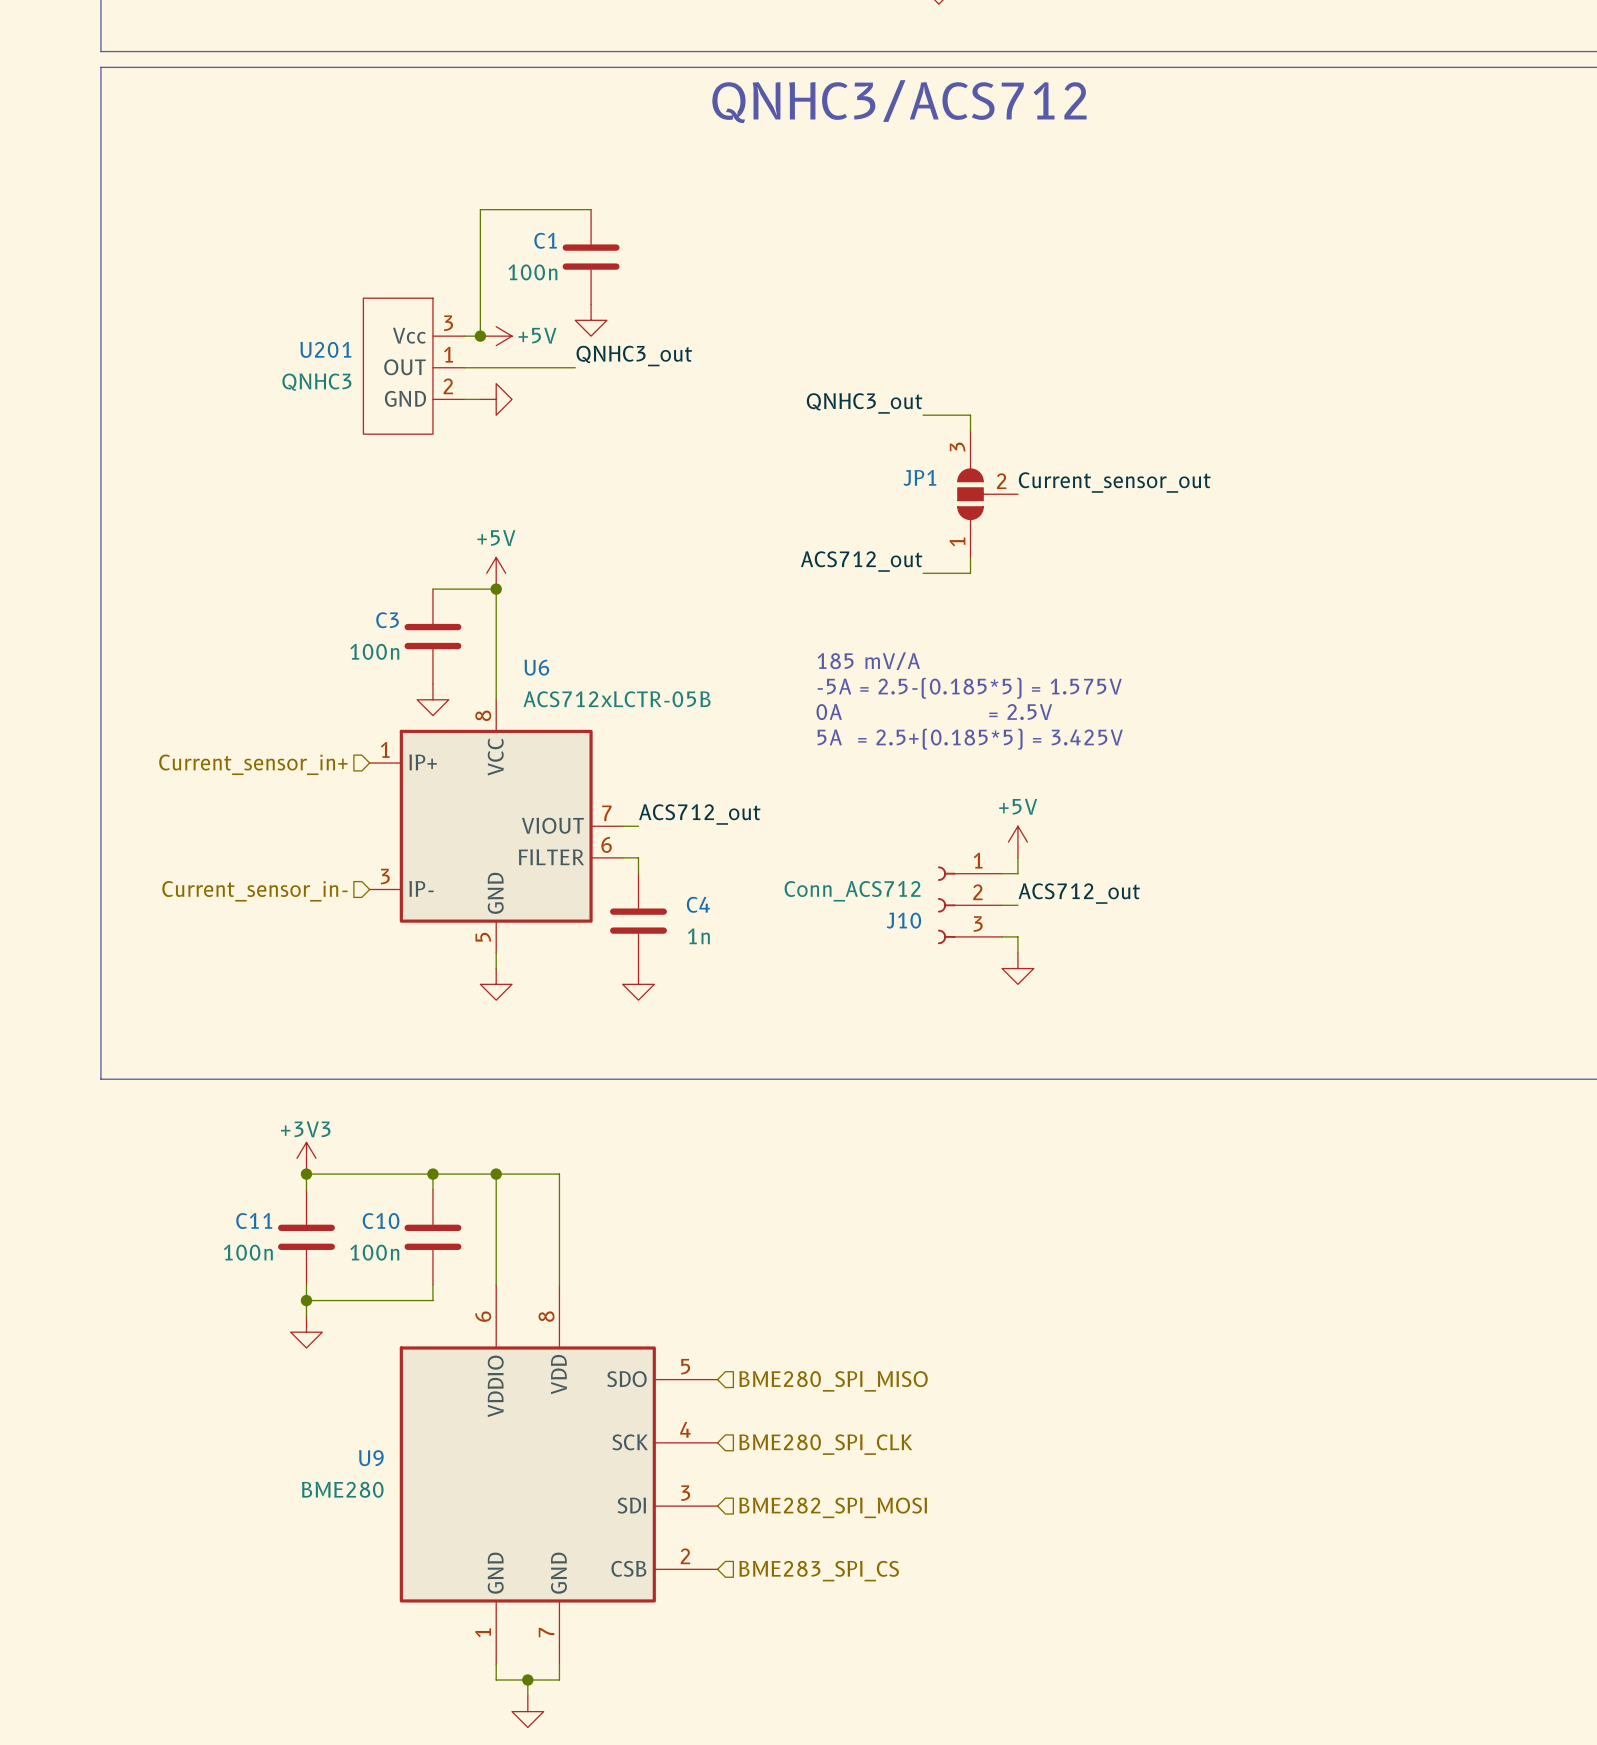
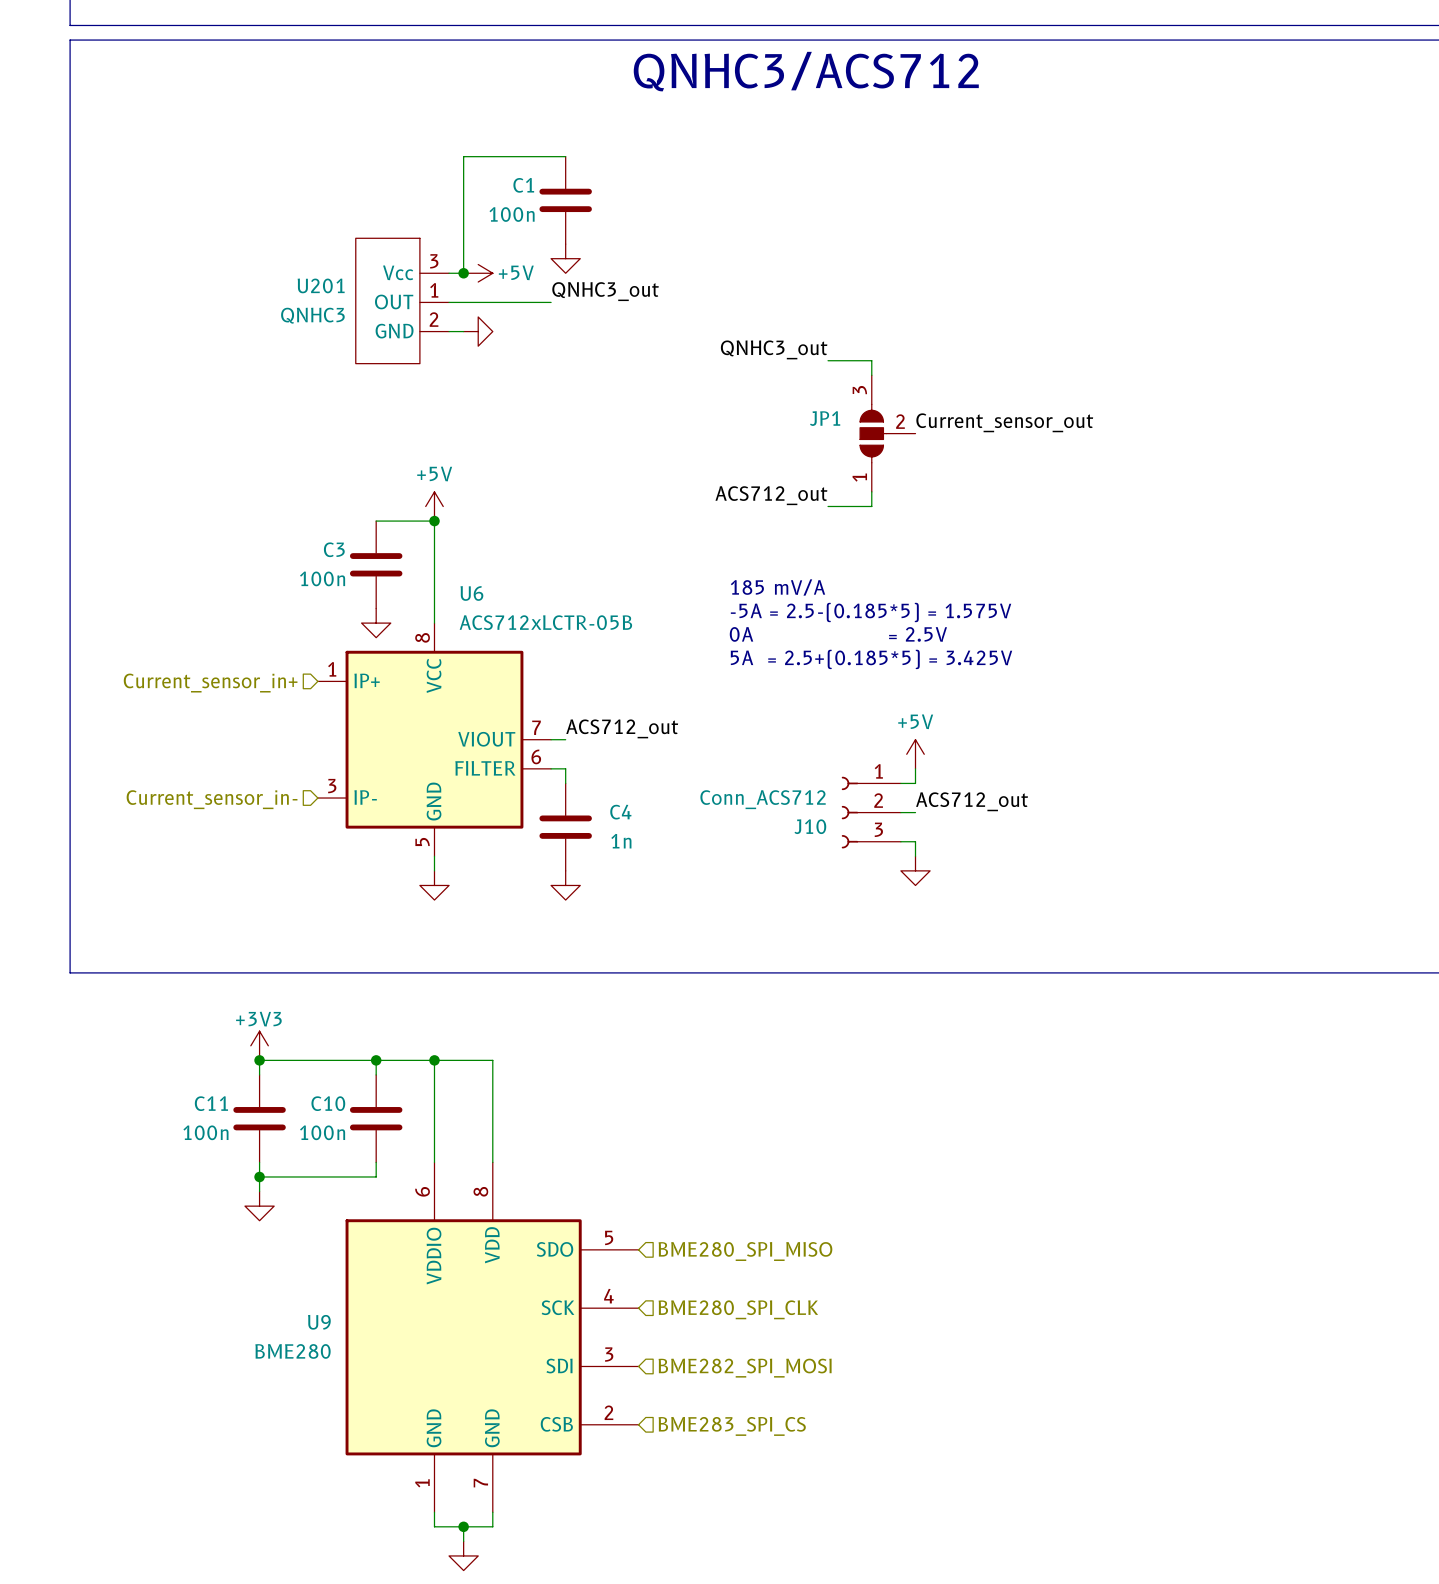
wire: (591, 209) (480, 209) (480, 336) (464, 336) -> (565, 156) (463, 156) (463, 273) (449, 273)
C1 position: (591, 257) -> (565, 200)
power symbol: none -> (565, 258)
power symbol: (591, 320) -> none
junction position: (480, 336) -> (463, 273)
power symbol position: +5V (496, 336) -> +5V (478, 273)
label position: QNHC3_out (634, 356) -> QNHC3_out (605, 291)
U201 position: (413, 366) -> (402, 300)
wire: (464, 367) (575, 367) -> (449, 302) (551, 302)
power symbol: none -> (478, 331)
wire: (464, 399) (480, 399) -> (449, 331) (463, 331)
power symbol: (496, 399) -> none

